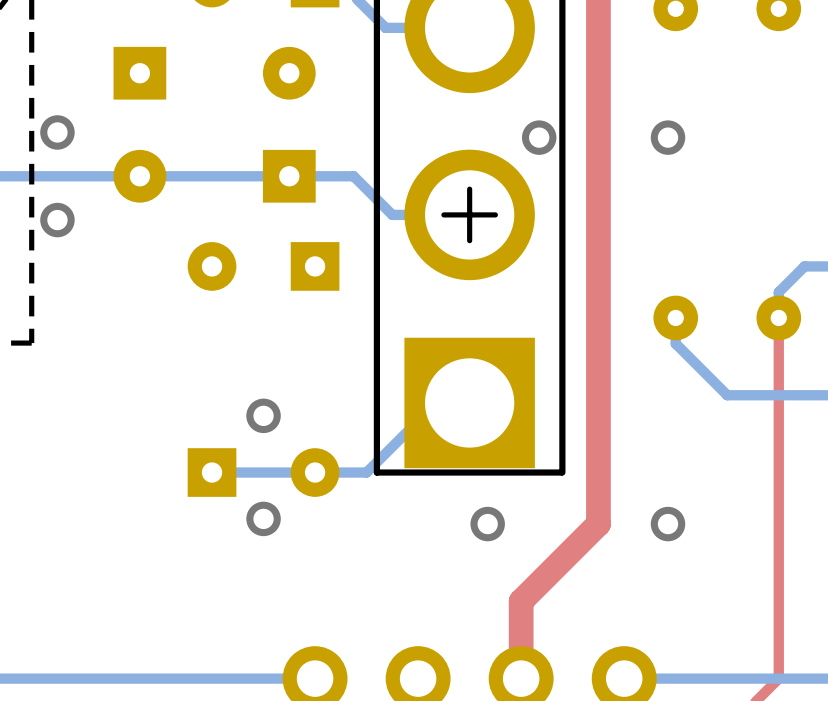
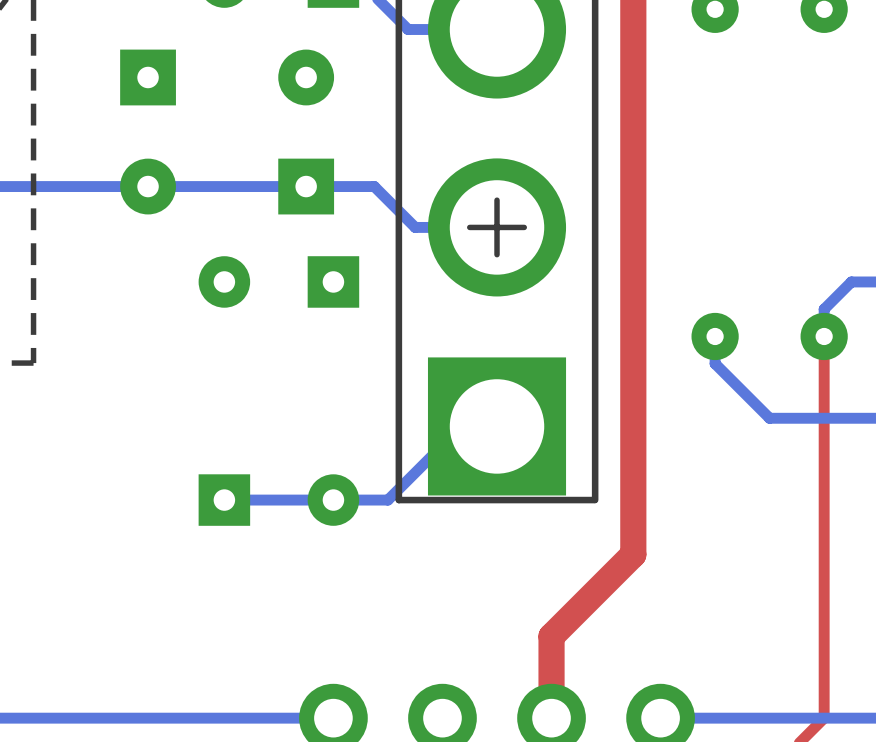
via: (57, 132) -> none
via: (539, 137) -> none
via: (668, 137) -> none
via: (57, 220) -> none
via: (263, 415) -> none
via: (263, 518) -> none
via: (487, 524) -> none
via: (668, 524) -> none

